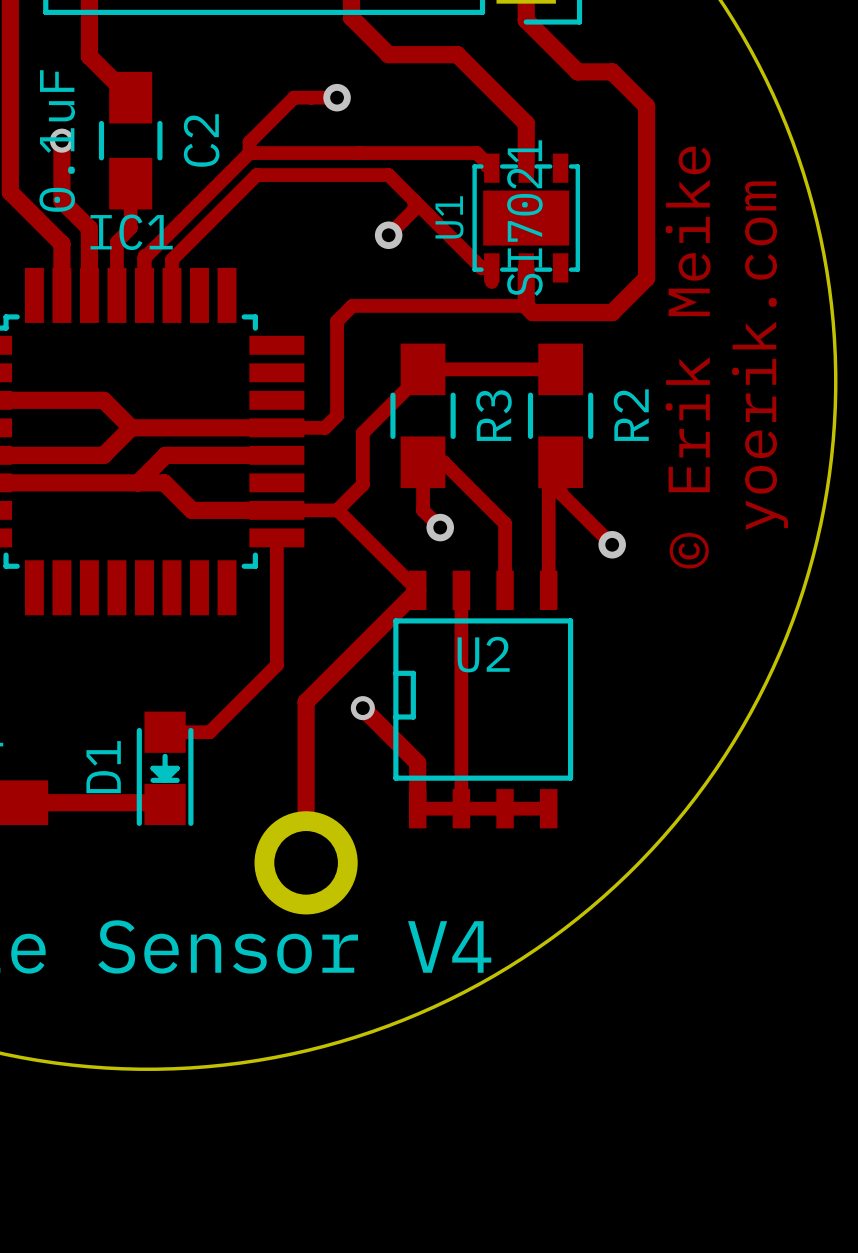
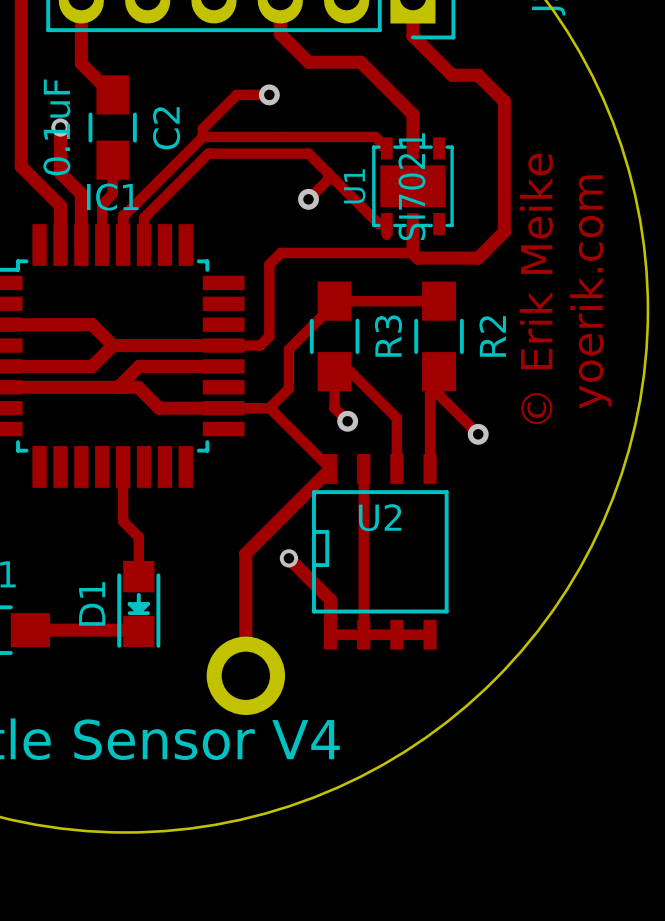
track: (276, 537) (276, 665) (209, 732) (165, 732) -> (123, 466) (123, 521) (138, 537) (138, 576)

